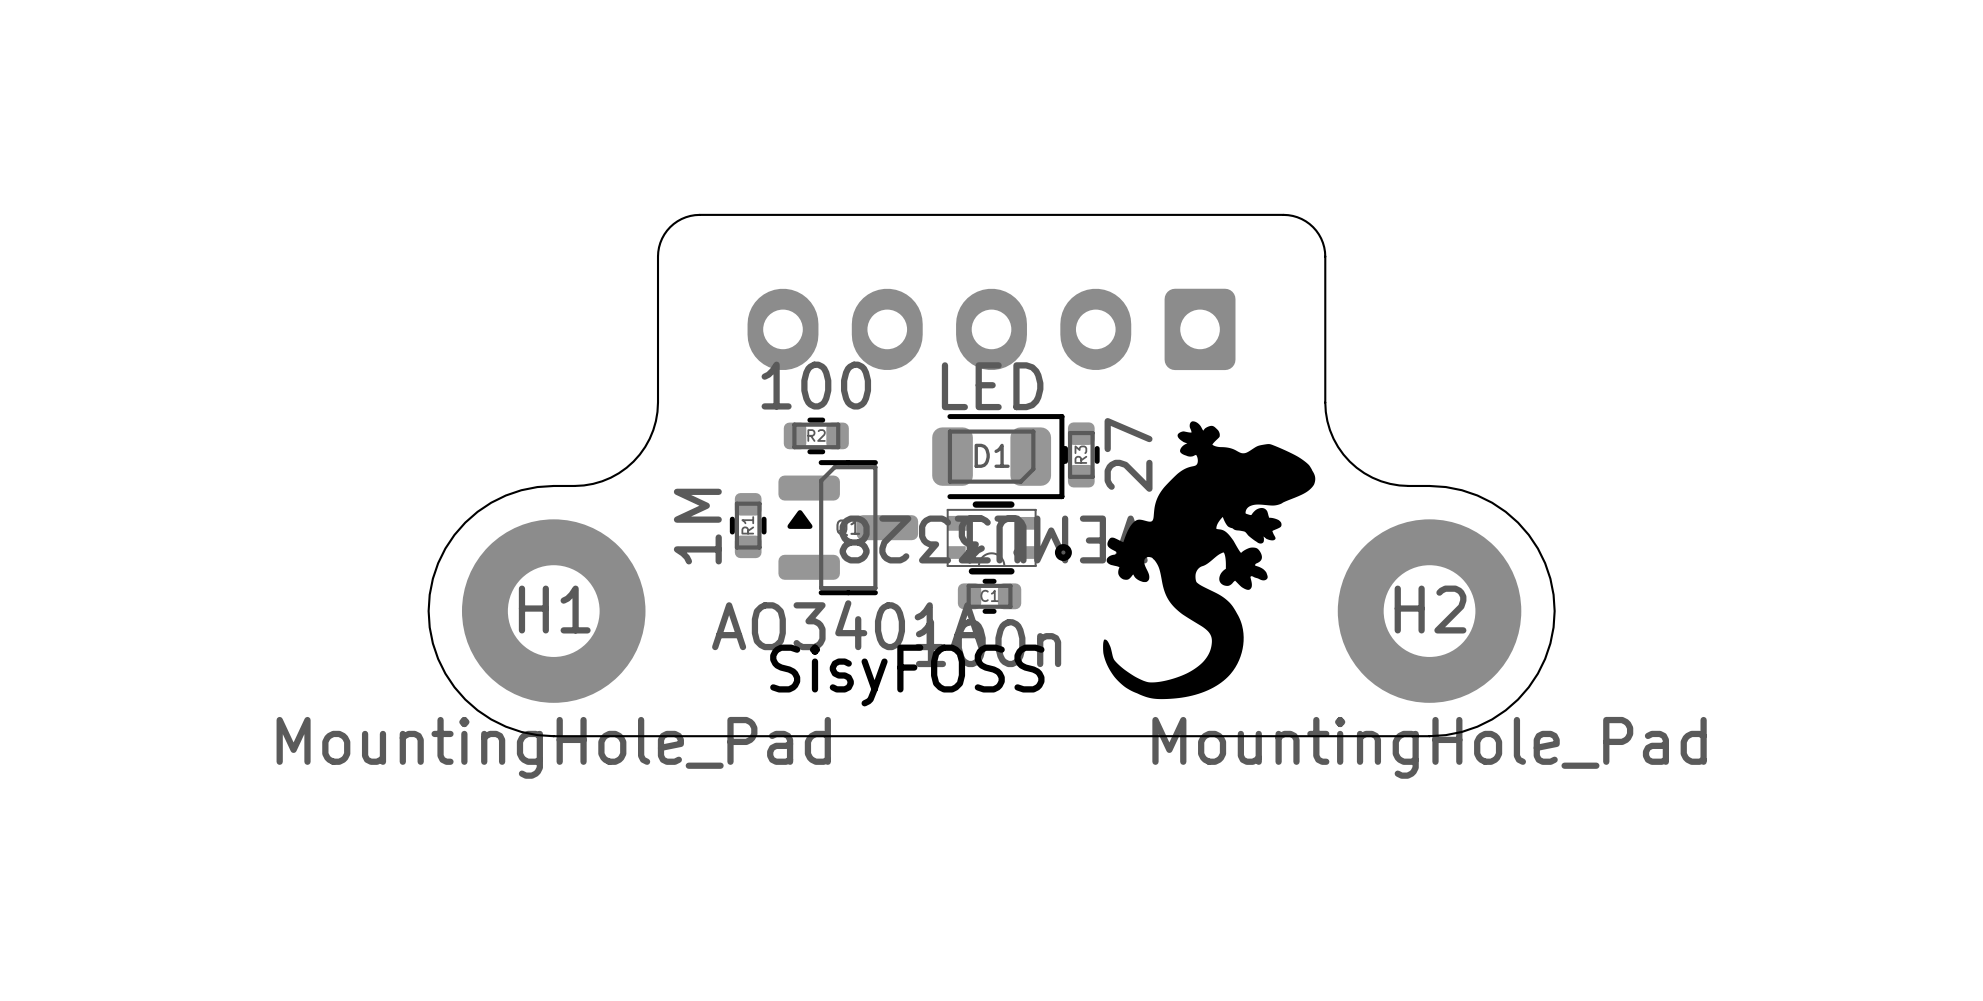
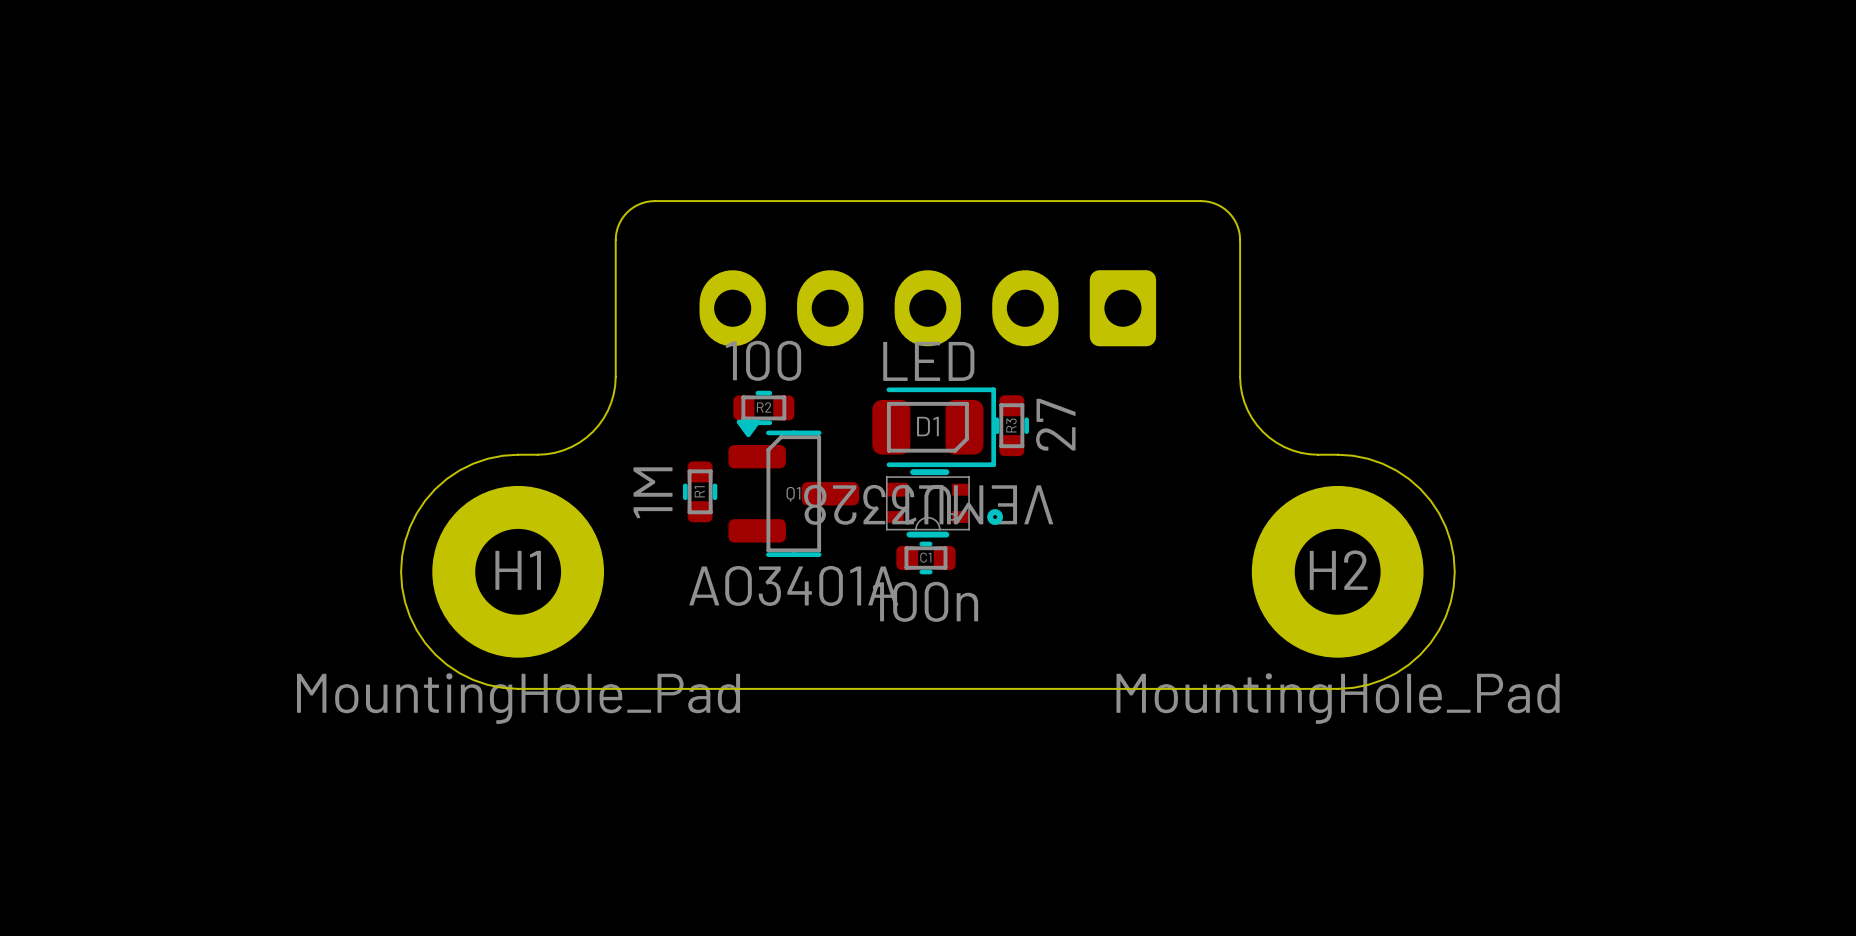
drawing: [1103, 421, 1316, 700] -> none
Q1 footprint: [778, 460, 919, 596] -> [728, 419, 860, 557]
text: SisyFOSS (907, 675) -> none

